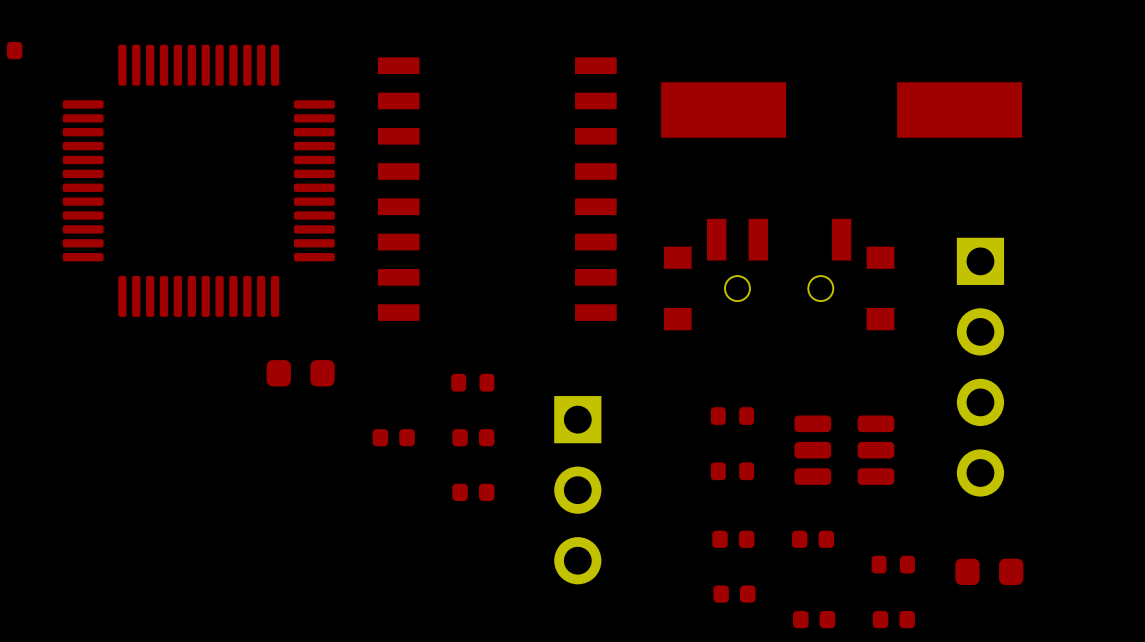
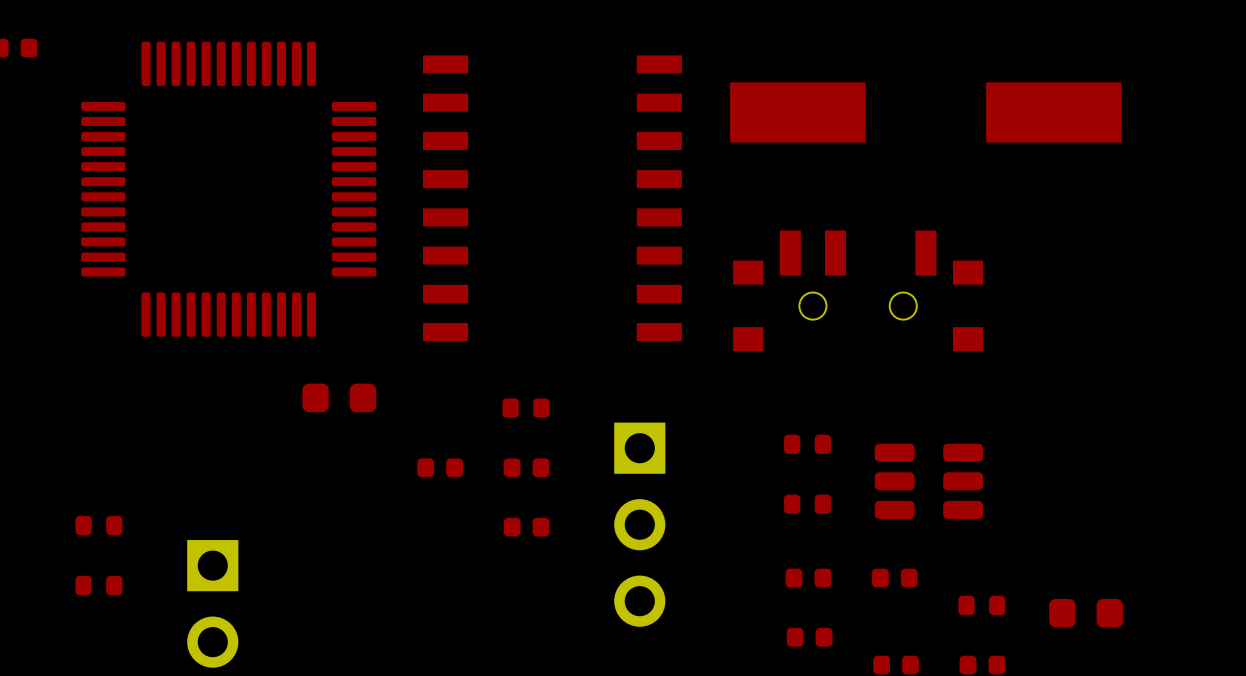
part: (980, 367) -> none
part: none -> (98, 525)
part: none -> (98, 585)
part: none -> (212, 603)

